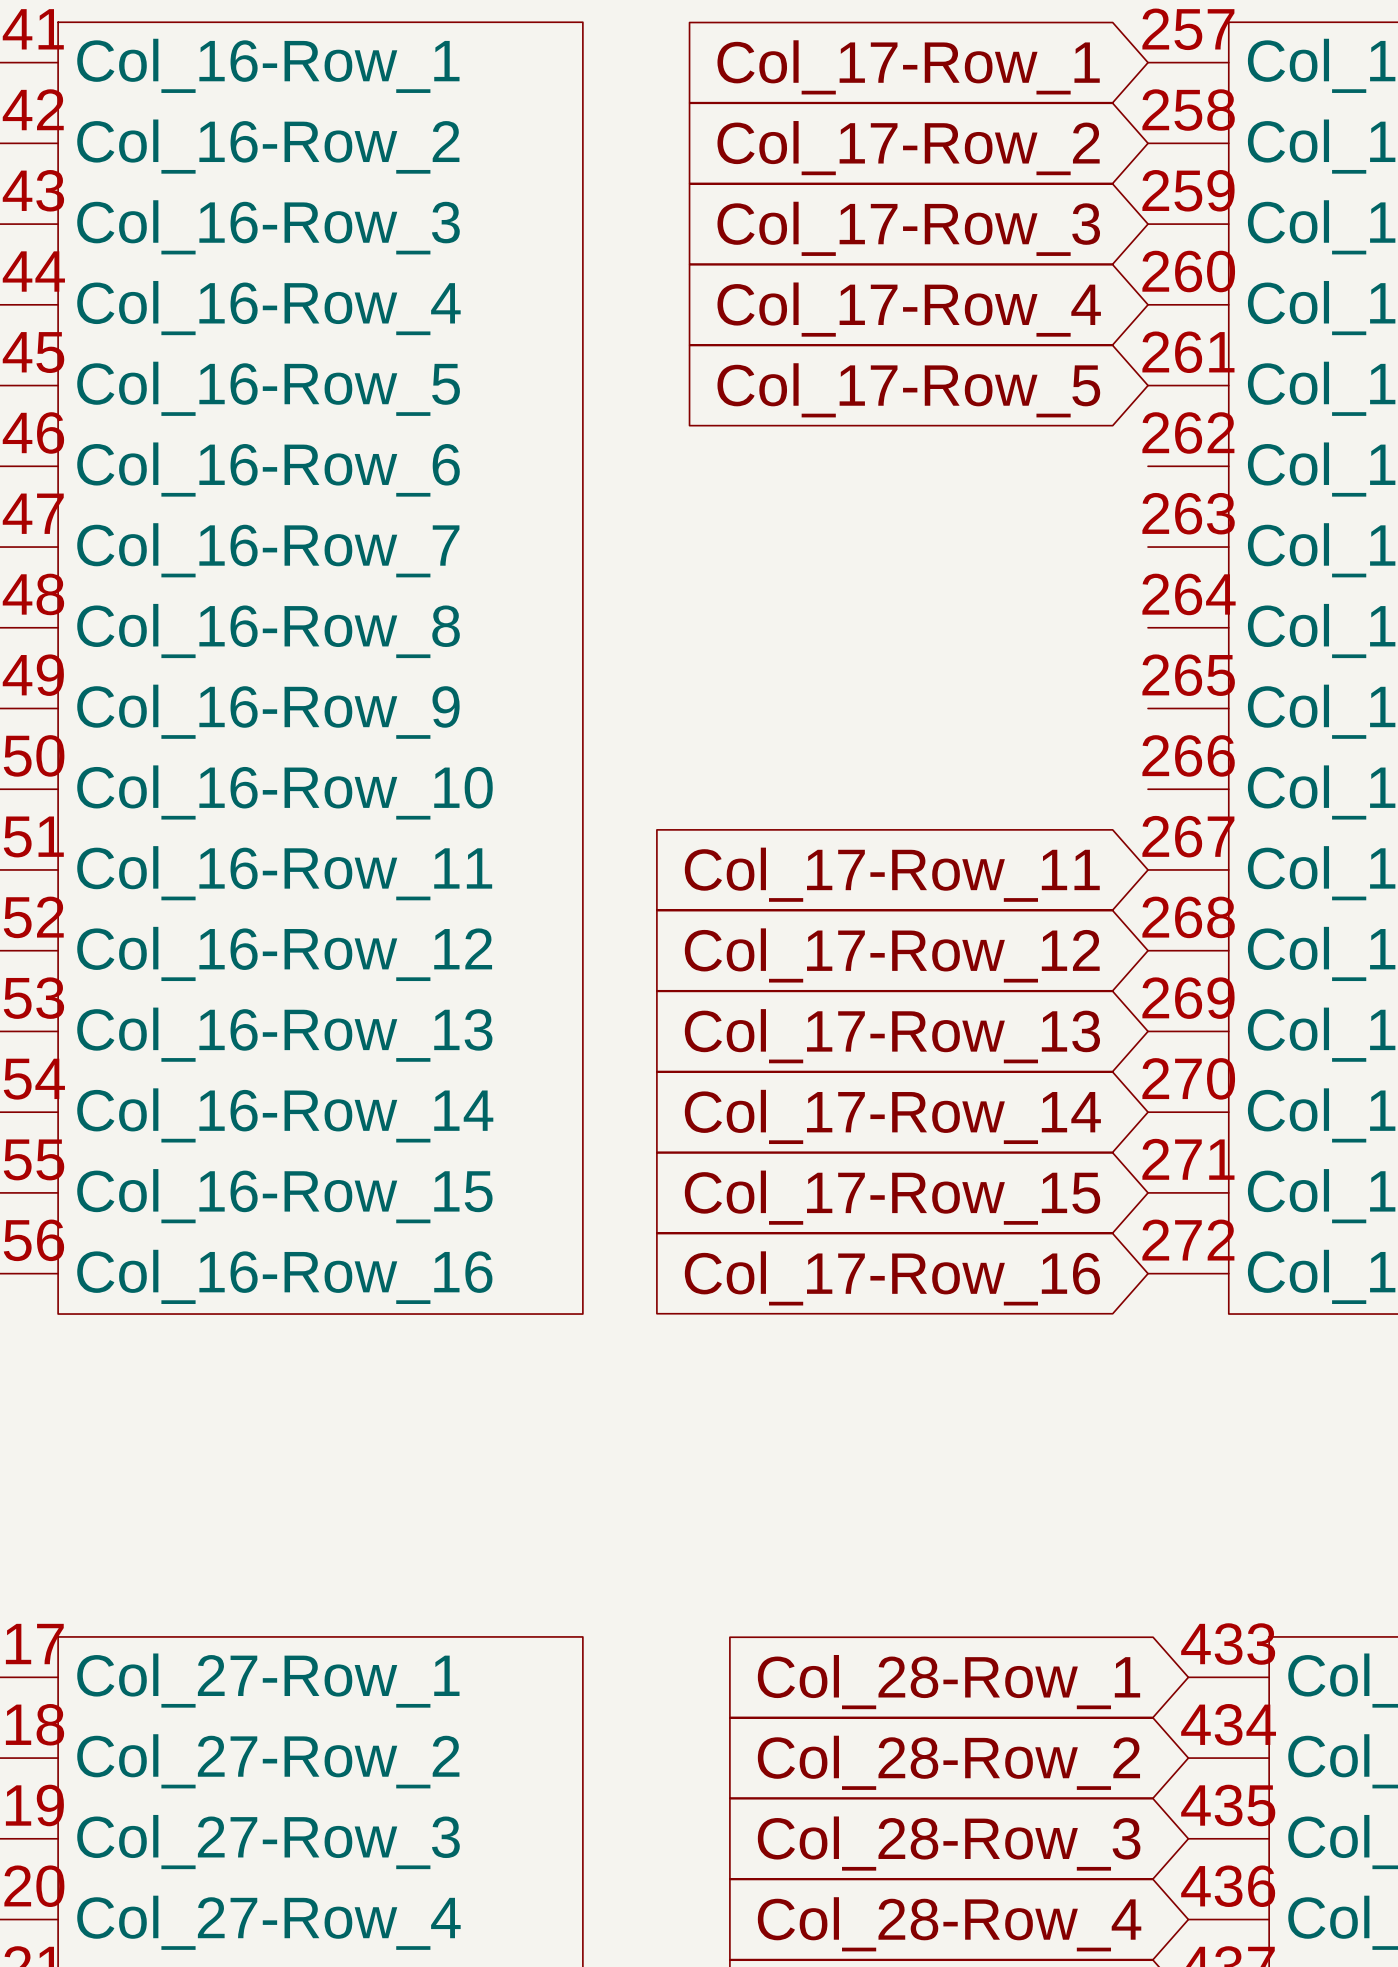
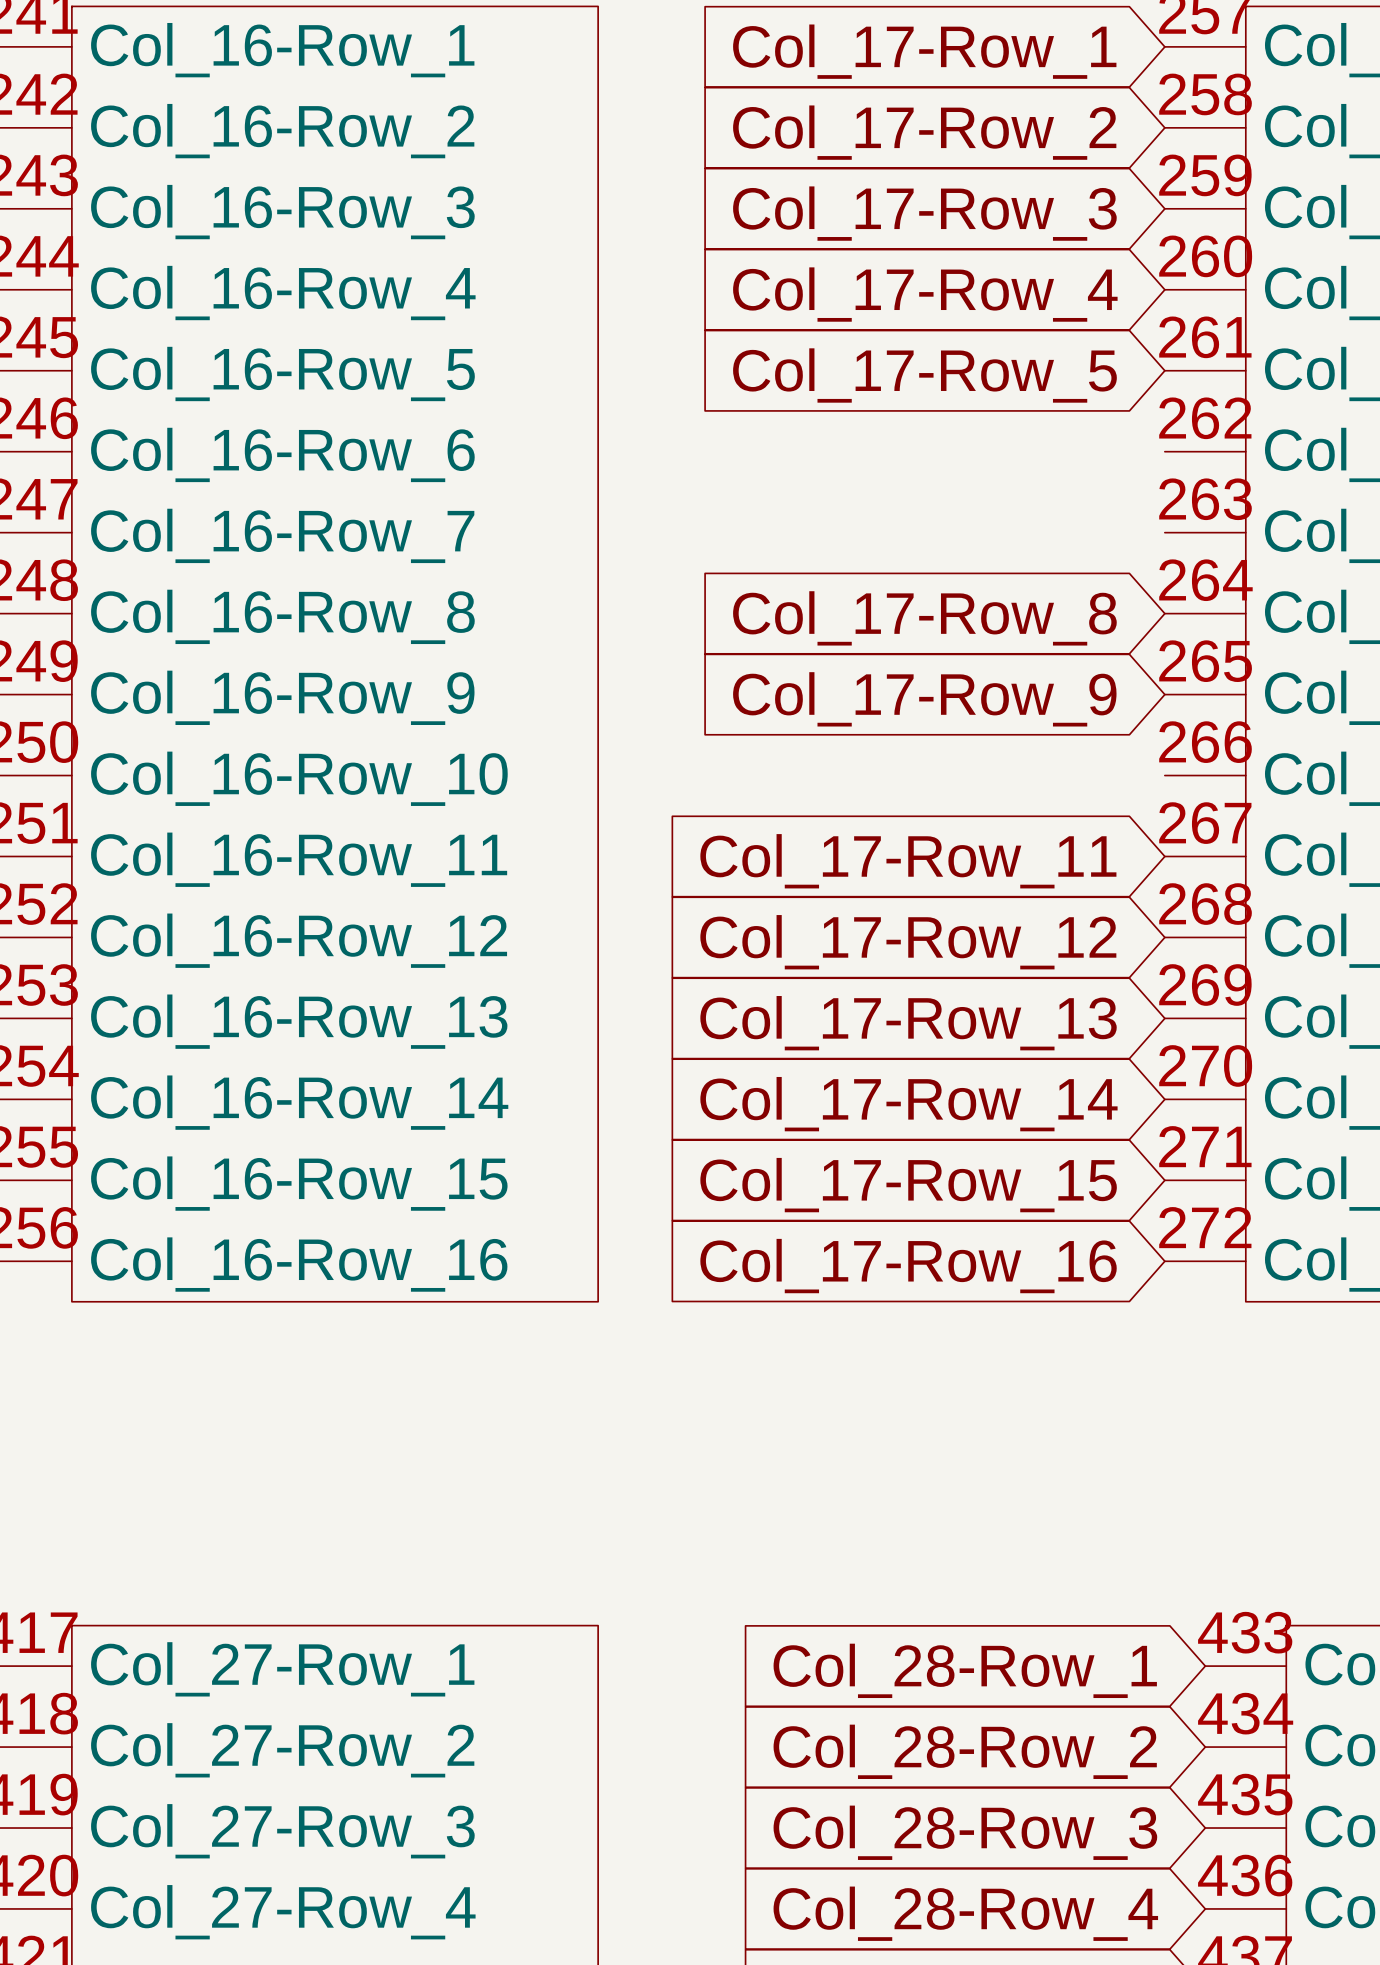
global label: none -> Col_17-Row_8 (924, 618)
global label: none -> Col_17-Row_9 (924, 699)

